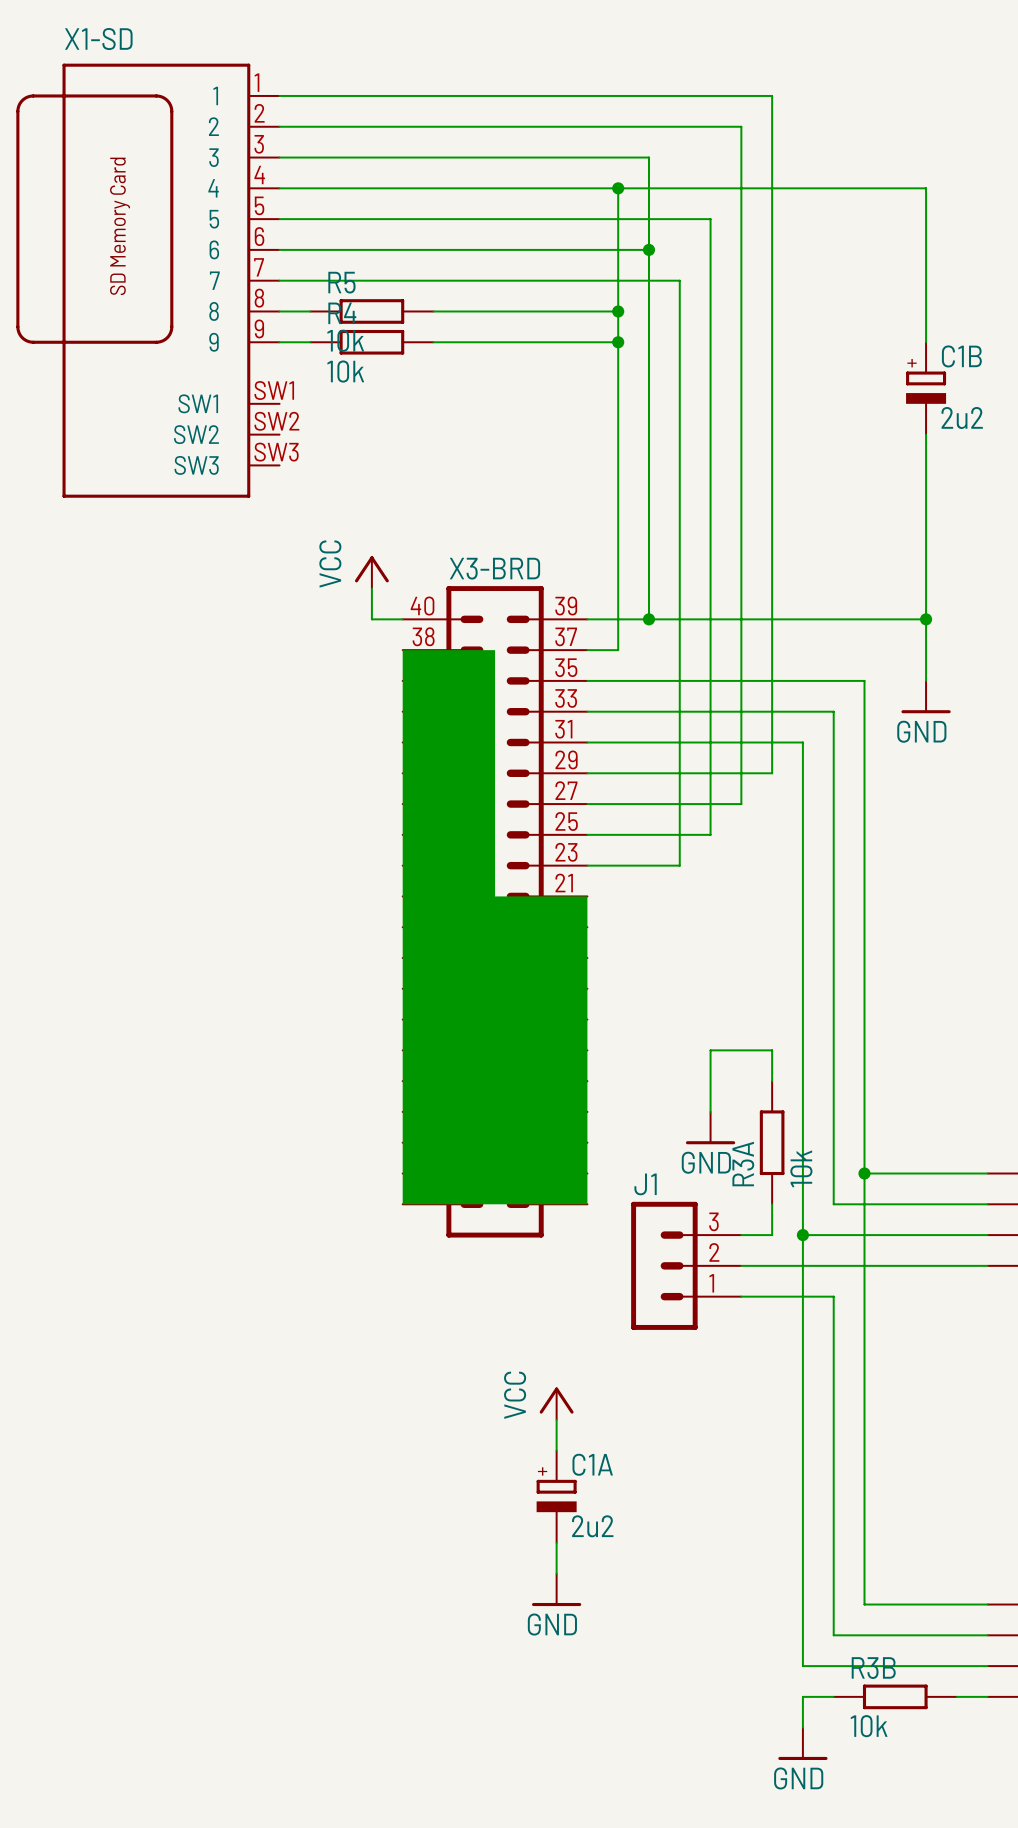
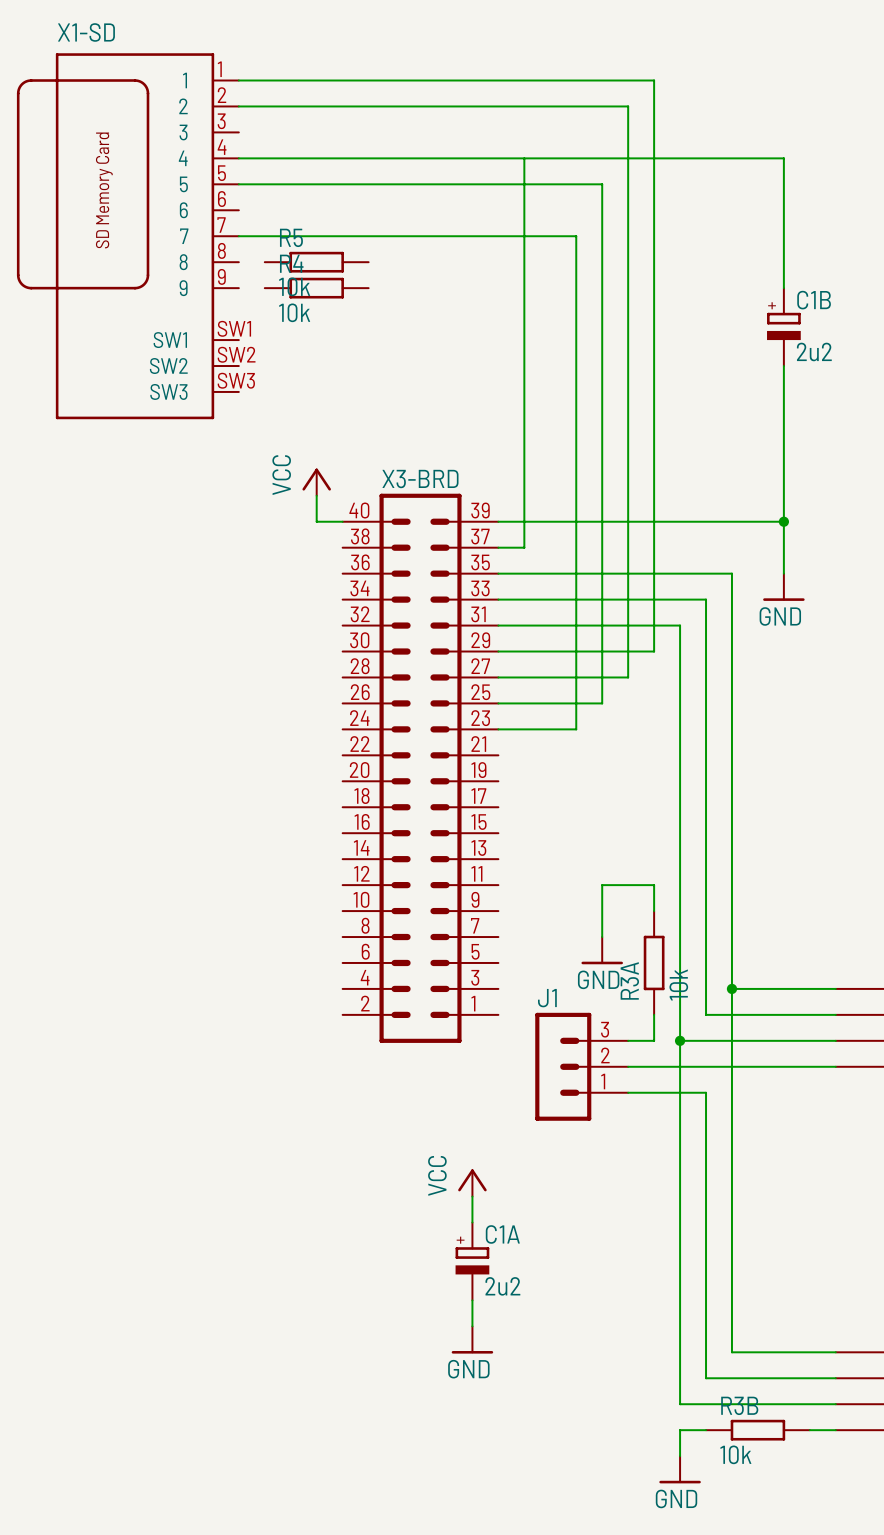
wire: (279, 157) (648, 157) (648, 619) -> none
junction: (618, 188) -> none
wire: (279, 249) (648, 249) -> none
junction: (648, 249) -> none
wire: (279, 311) (310, 311) -> none
wire: (433, 311) (618, 311) -> none
junction: (618, 311) -> none
wire: (279, 342) (310, 342) -> none
wire: (433, 342) (618, 342) -> none
junction: (618, 342) -> none
junction: (648, 619) -> none
drawing: [402, 650, 588, 1205] -> none

